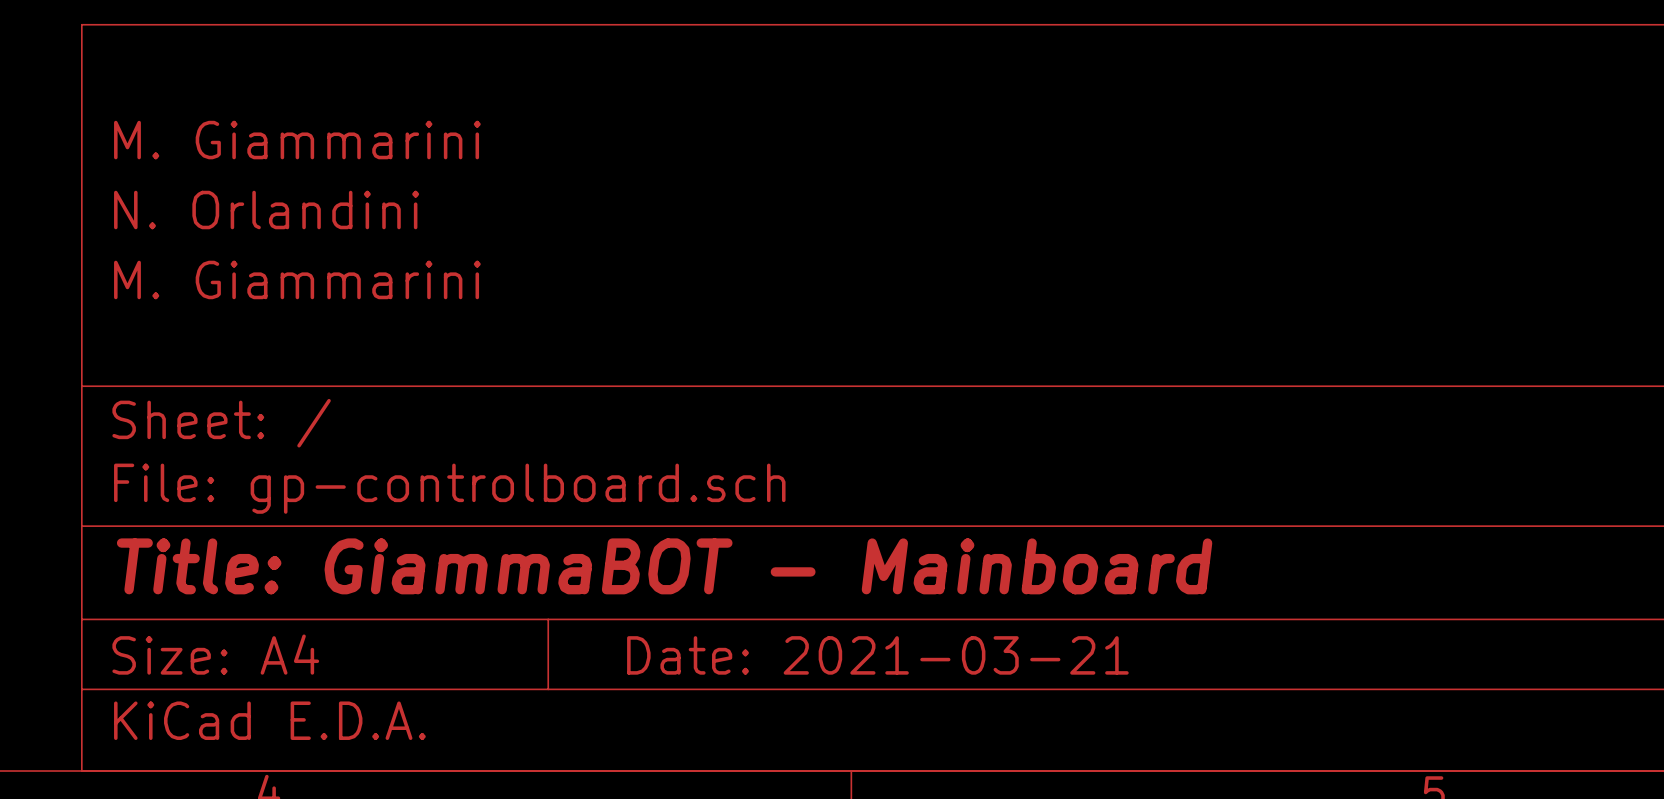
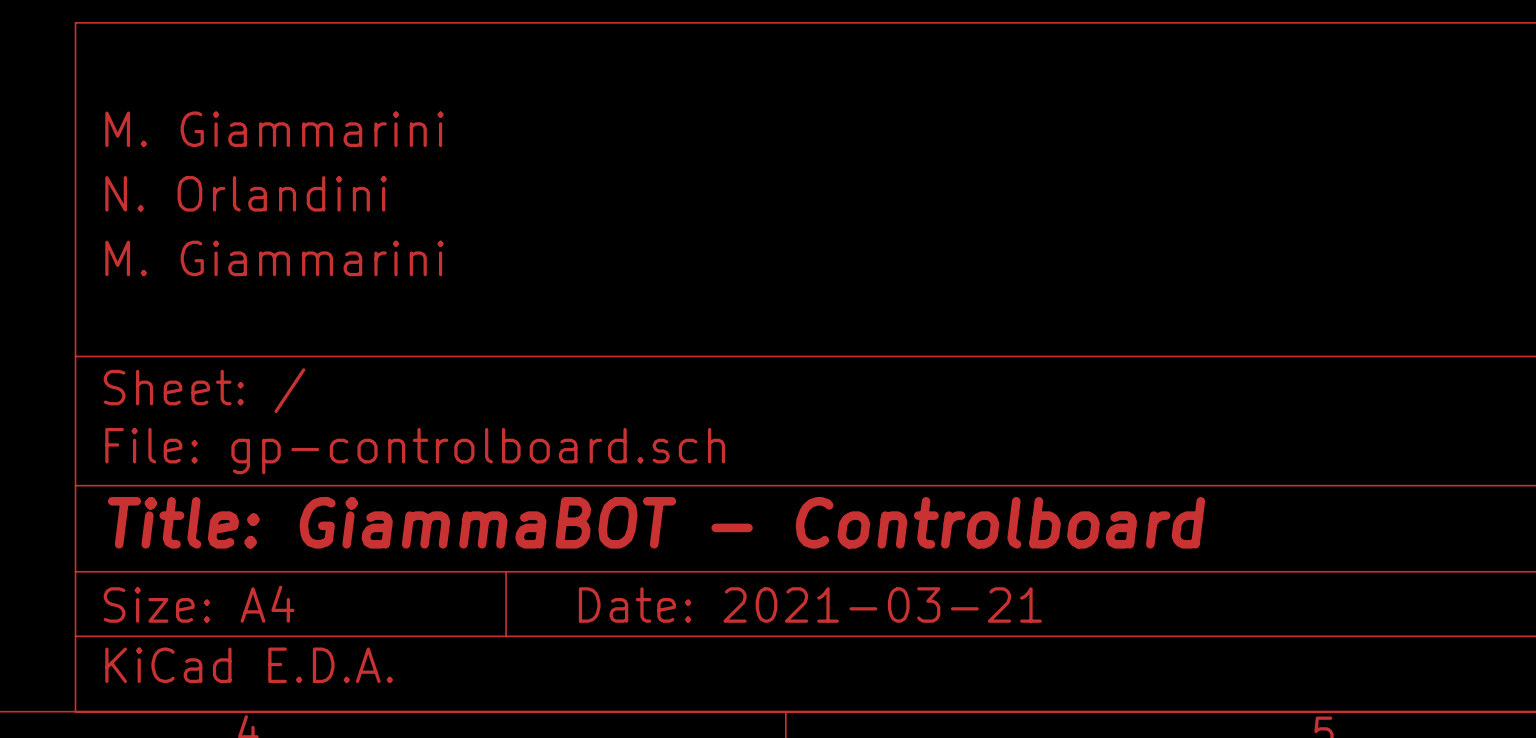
title block: Title: GiammaBOT - Mainboard (664, 566) -> Title: GiammaBOT - Controlboard (656, 522)

